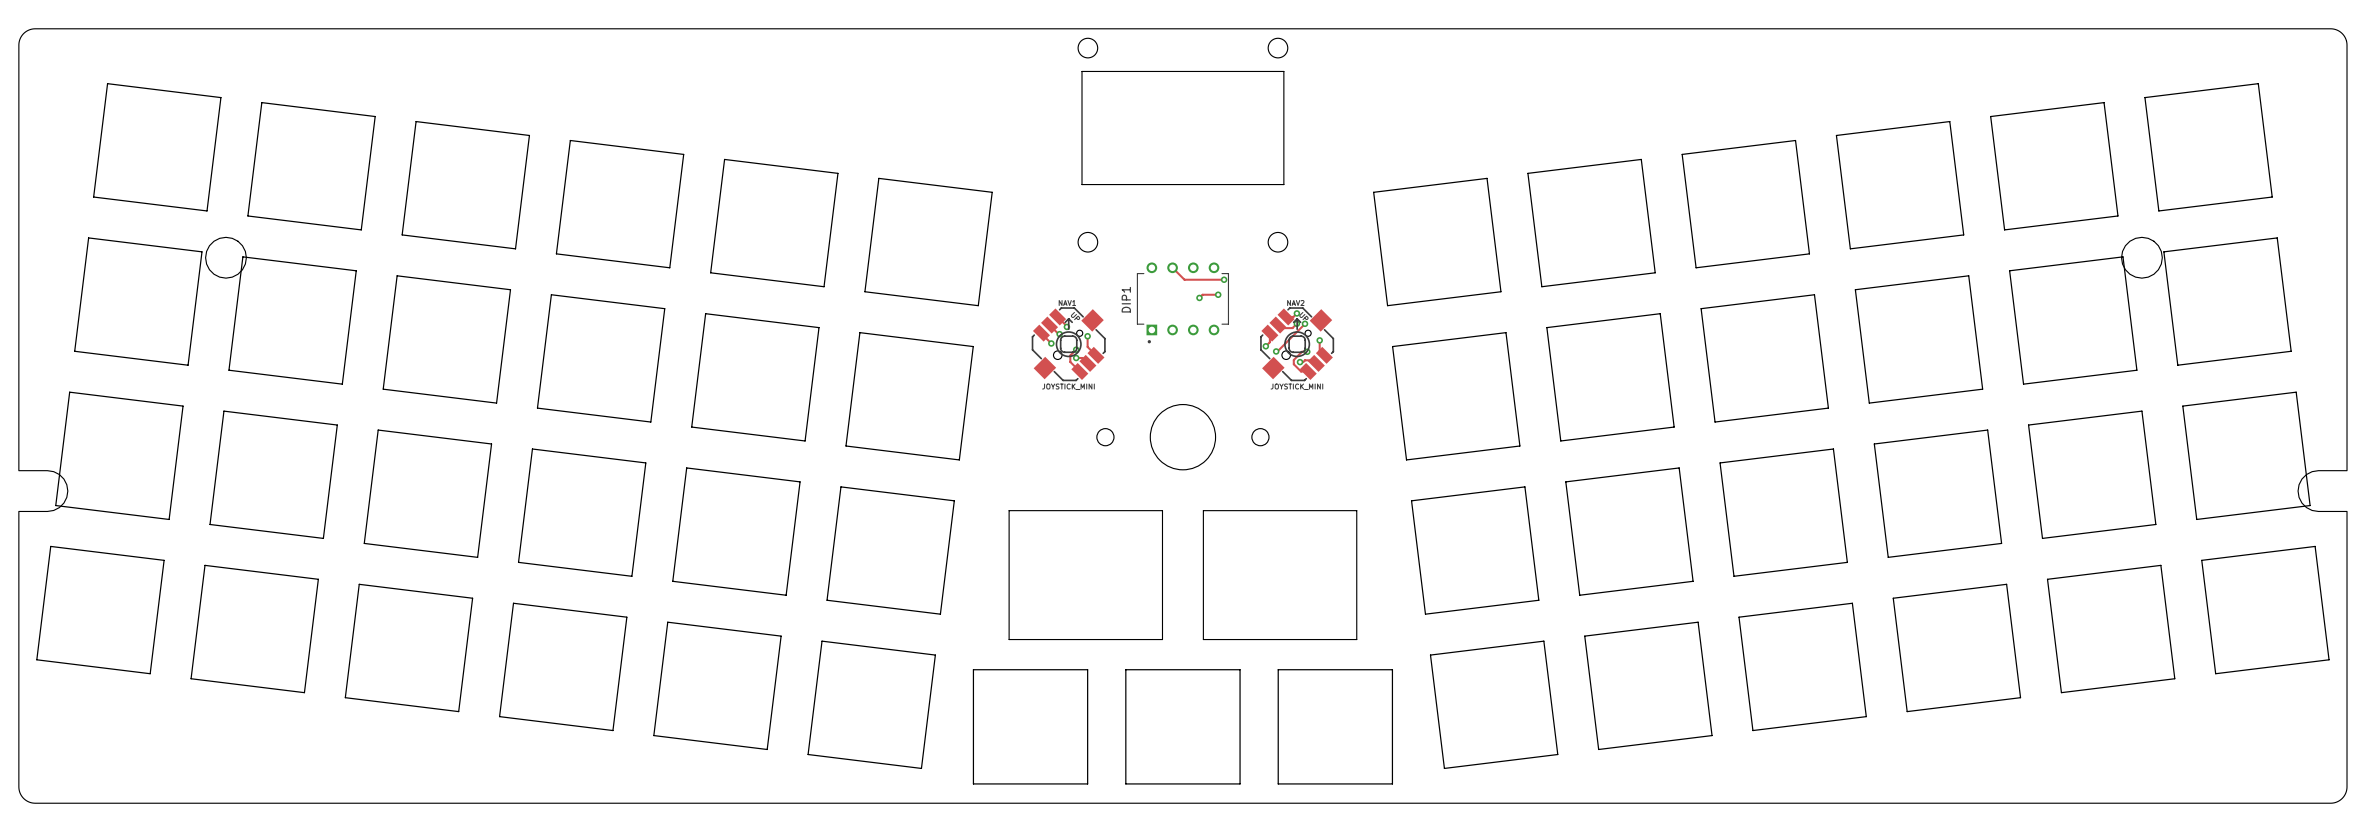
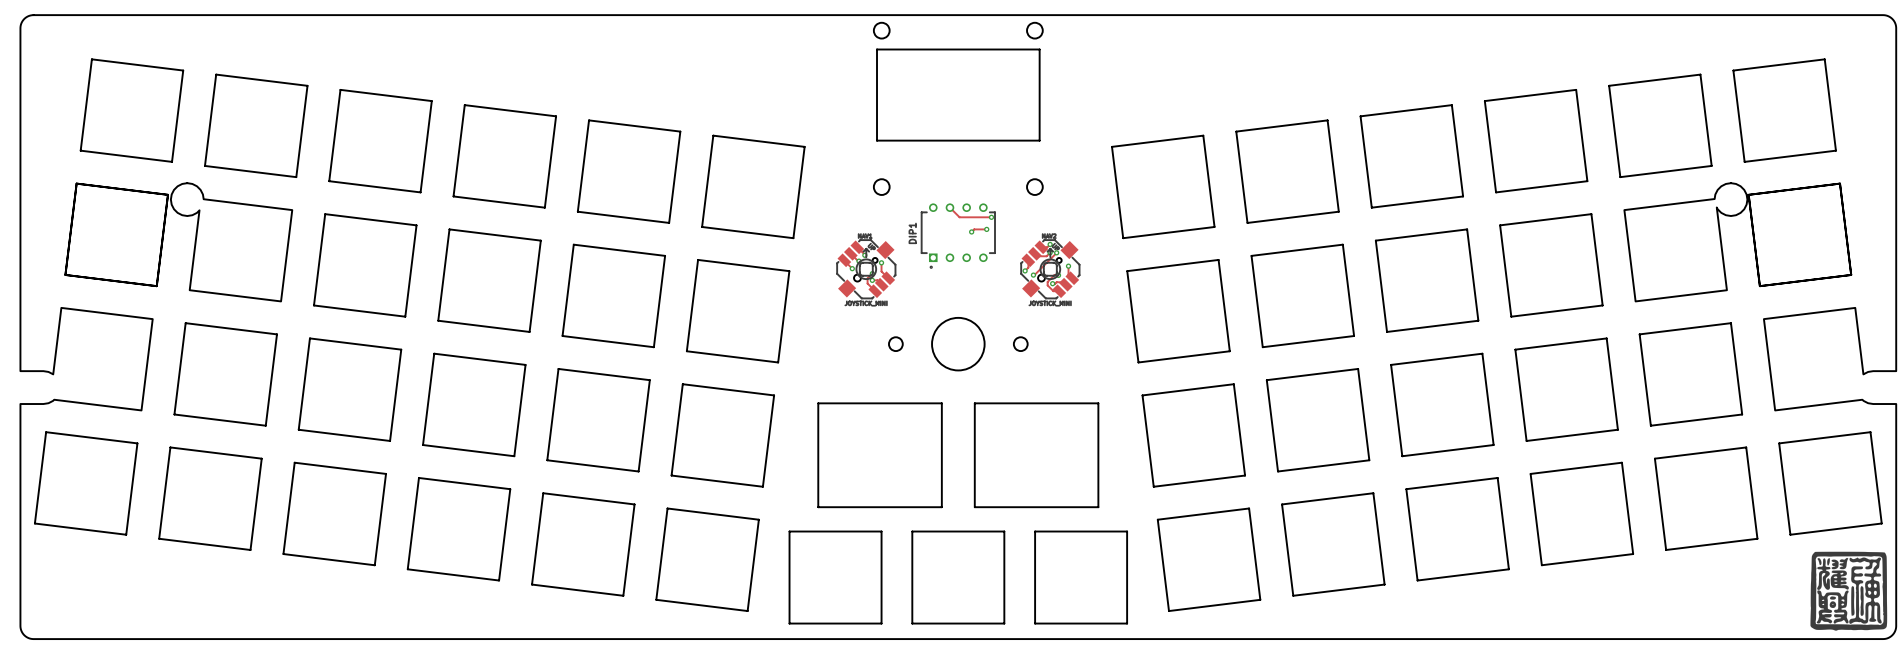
drawing shape: [18, 28, 2348, 804] -> [20, 14, 1897, 640]
drawing: [228, 256, 357, 385] -> none
drawing: [2009, 256, 2138, 385] -> none
drawing: [55, 391, 184, 521] -> none
drawing: [2182, 391, 2311, 521] -> none
drawing: none -> [1810, 551, 1888, 631]

